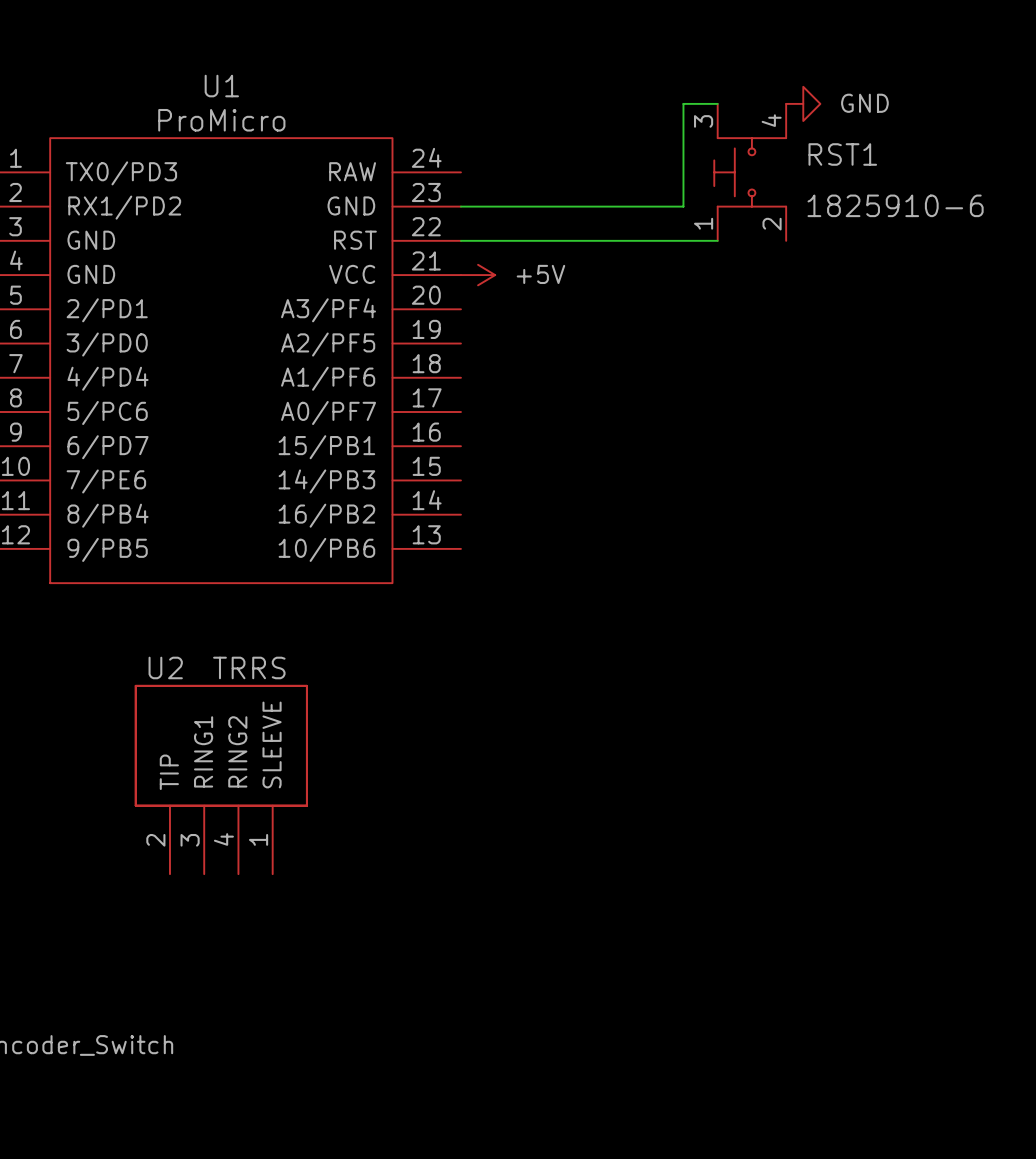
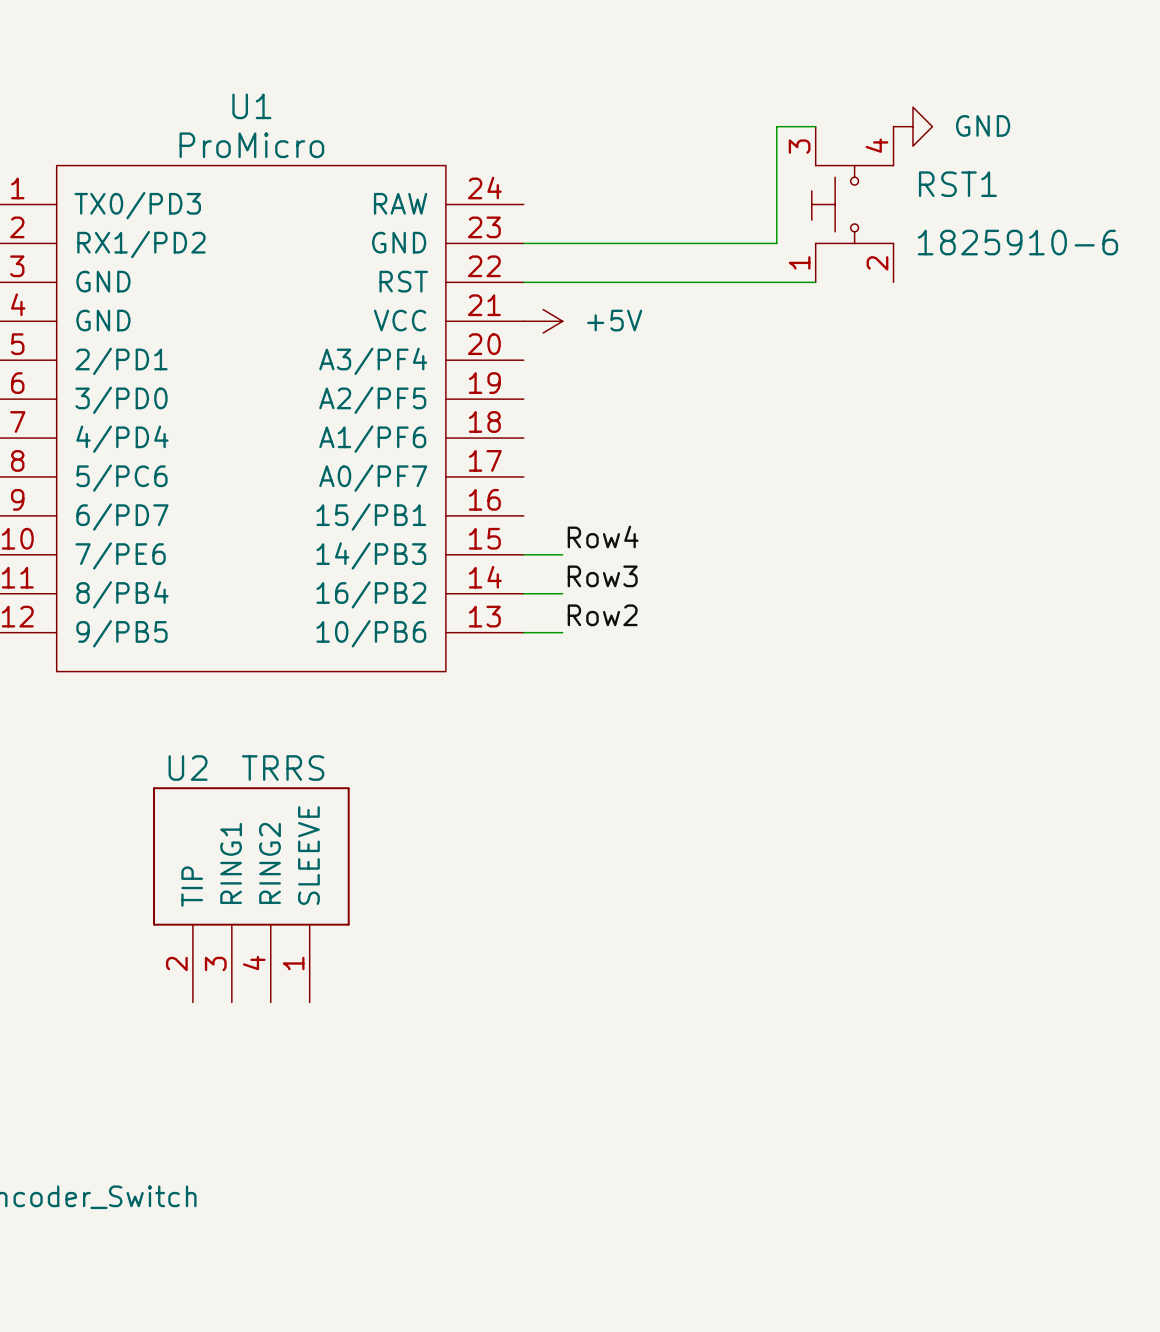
label: none -> Row4 (603, 536)
wire: none -> (523, 554) (562, 554)
label: none -> Row3 (602, 576)
wire: none -> (523, 593) (562, 593)
label: none -> Row2 (602, 615)
wire: none -> (523, 632) (562, 632)

